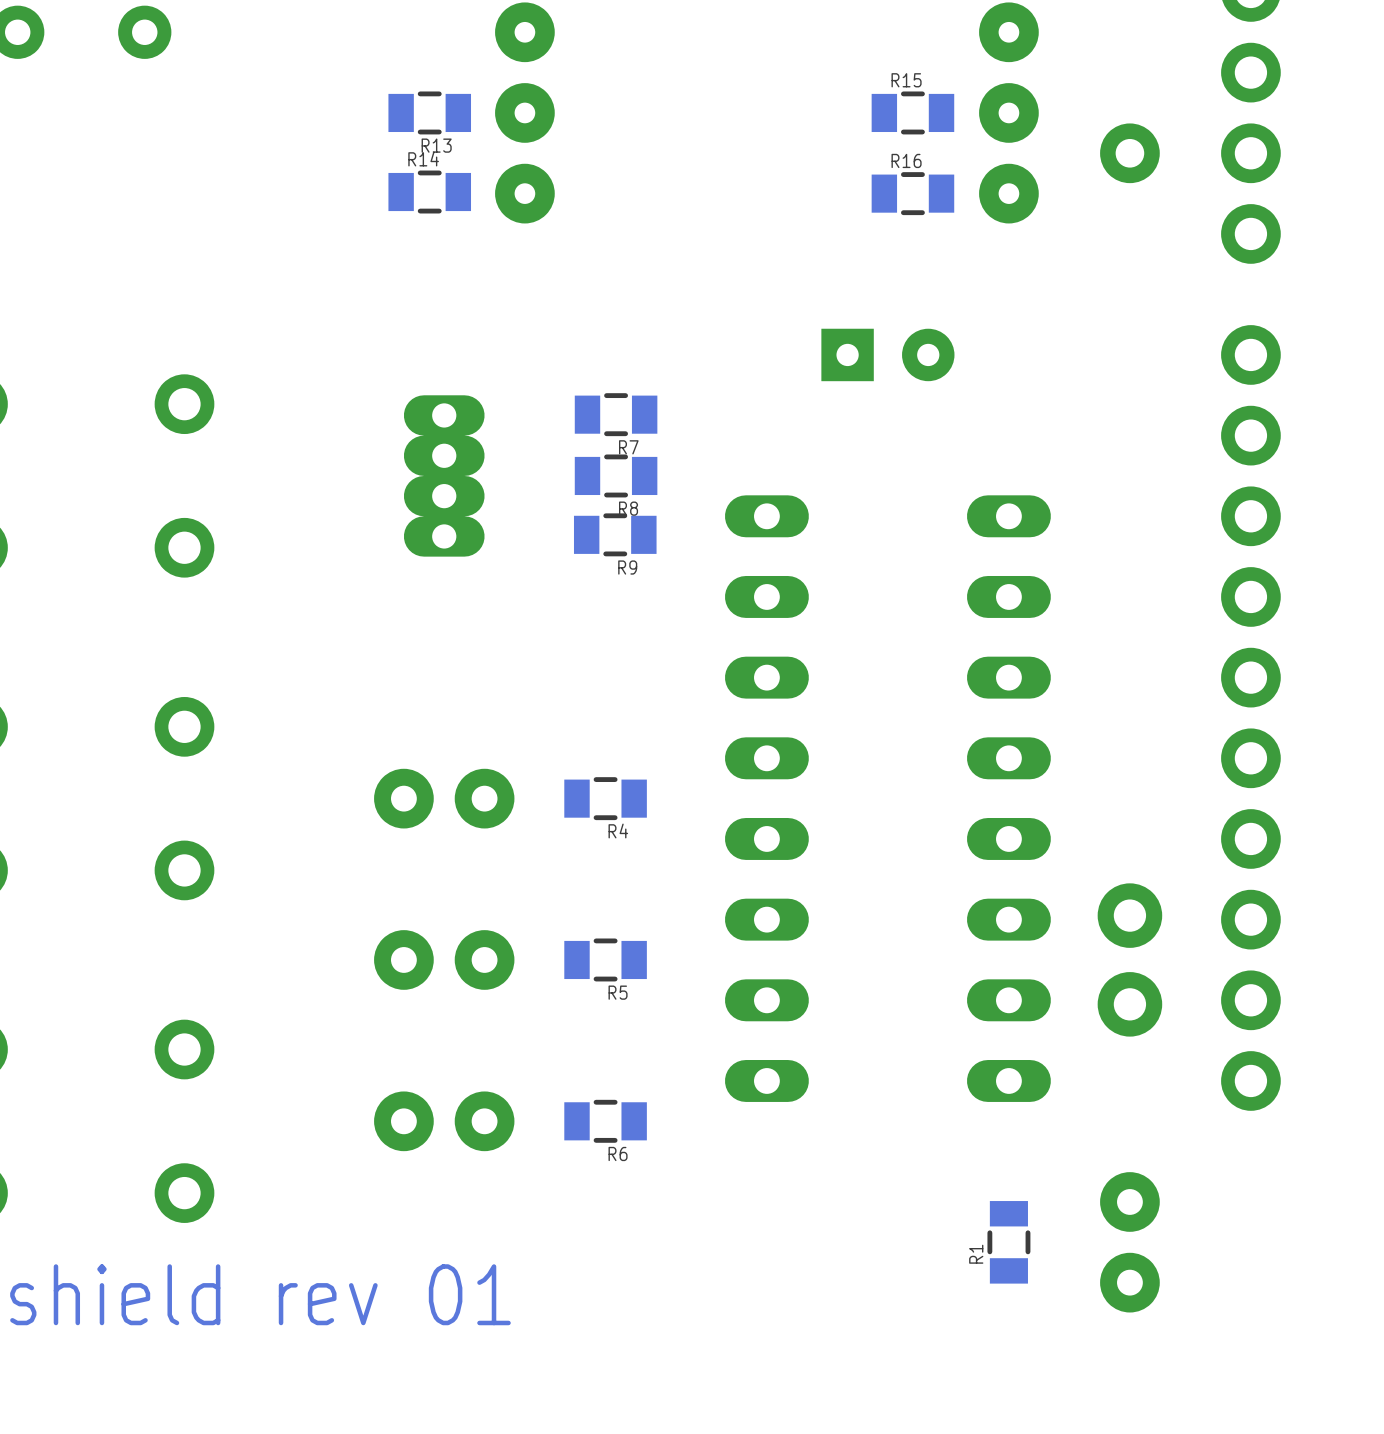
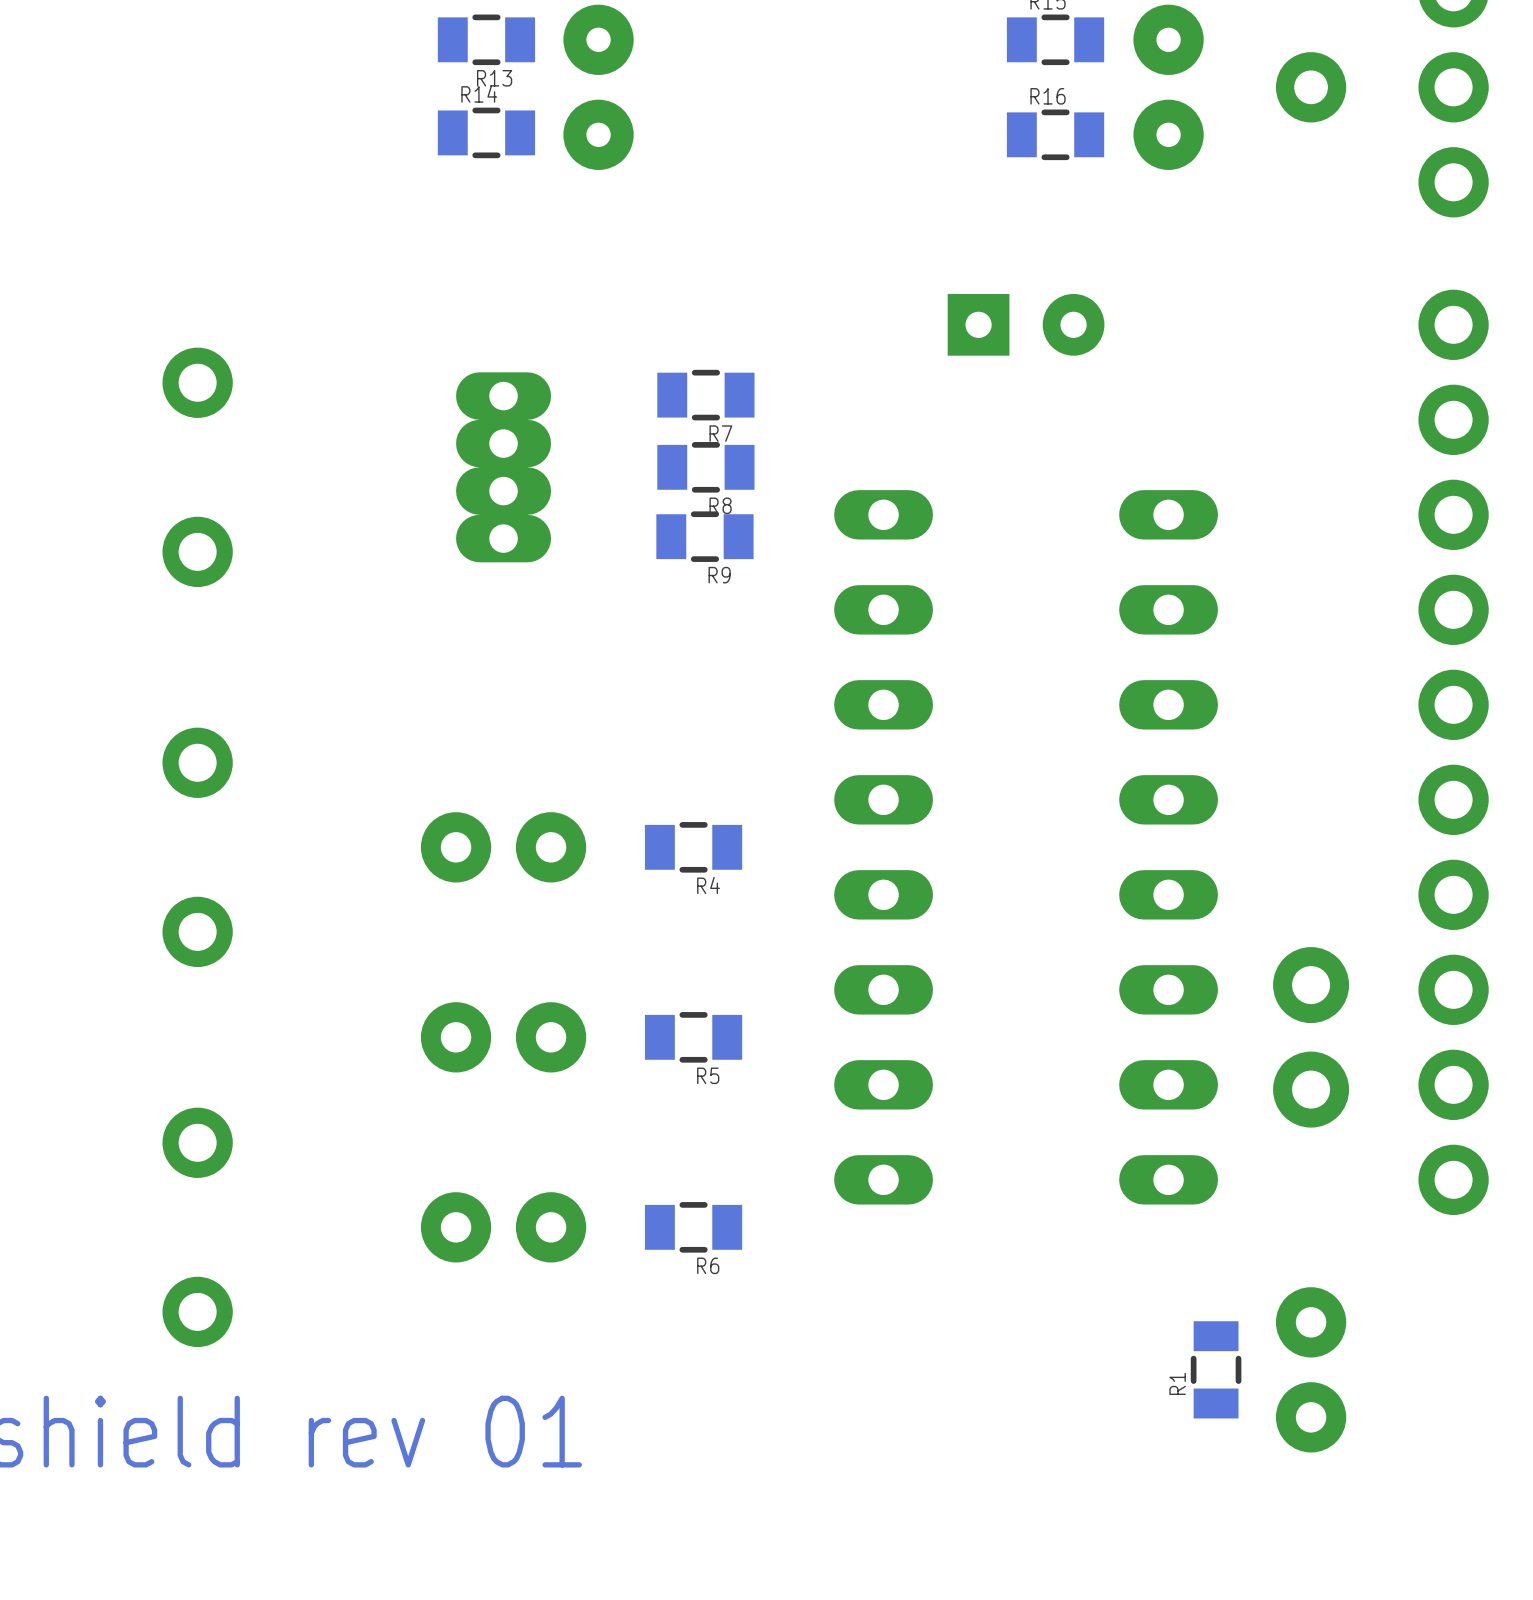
R1 position: (1008, 1242) -> (1216, 1369)

